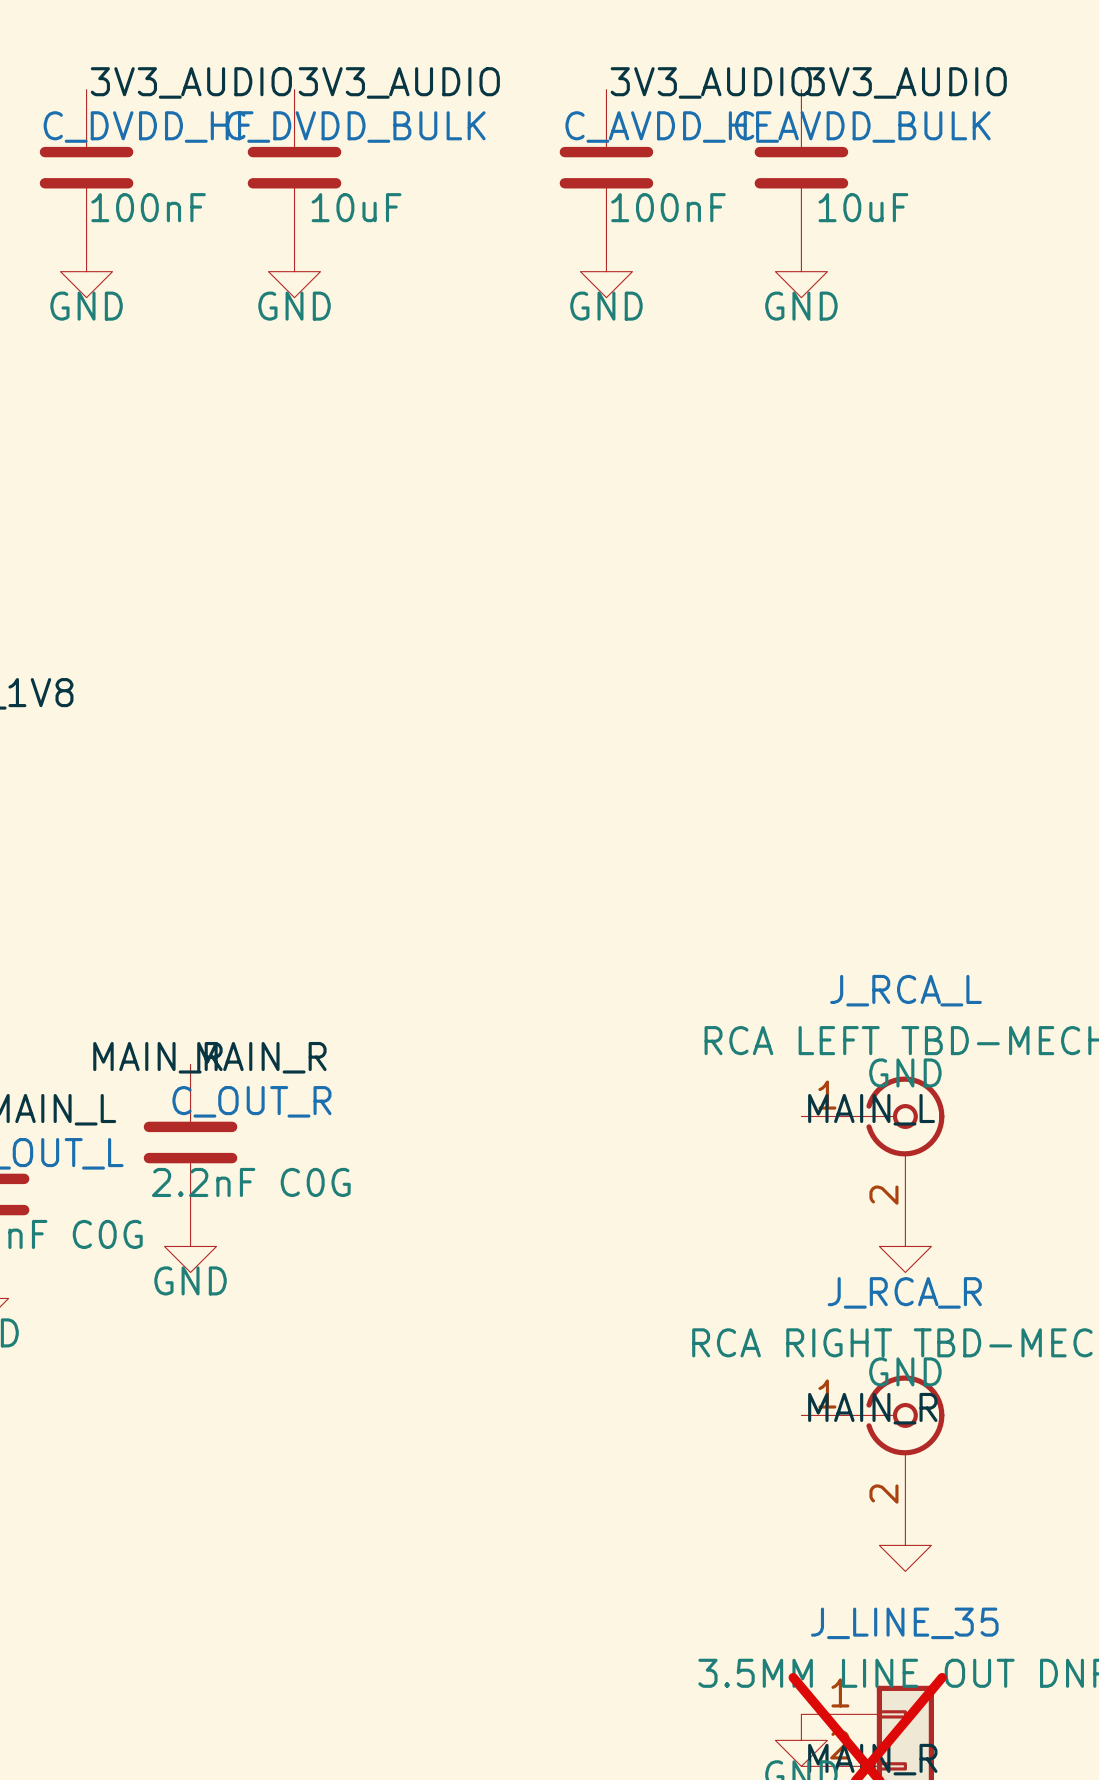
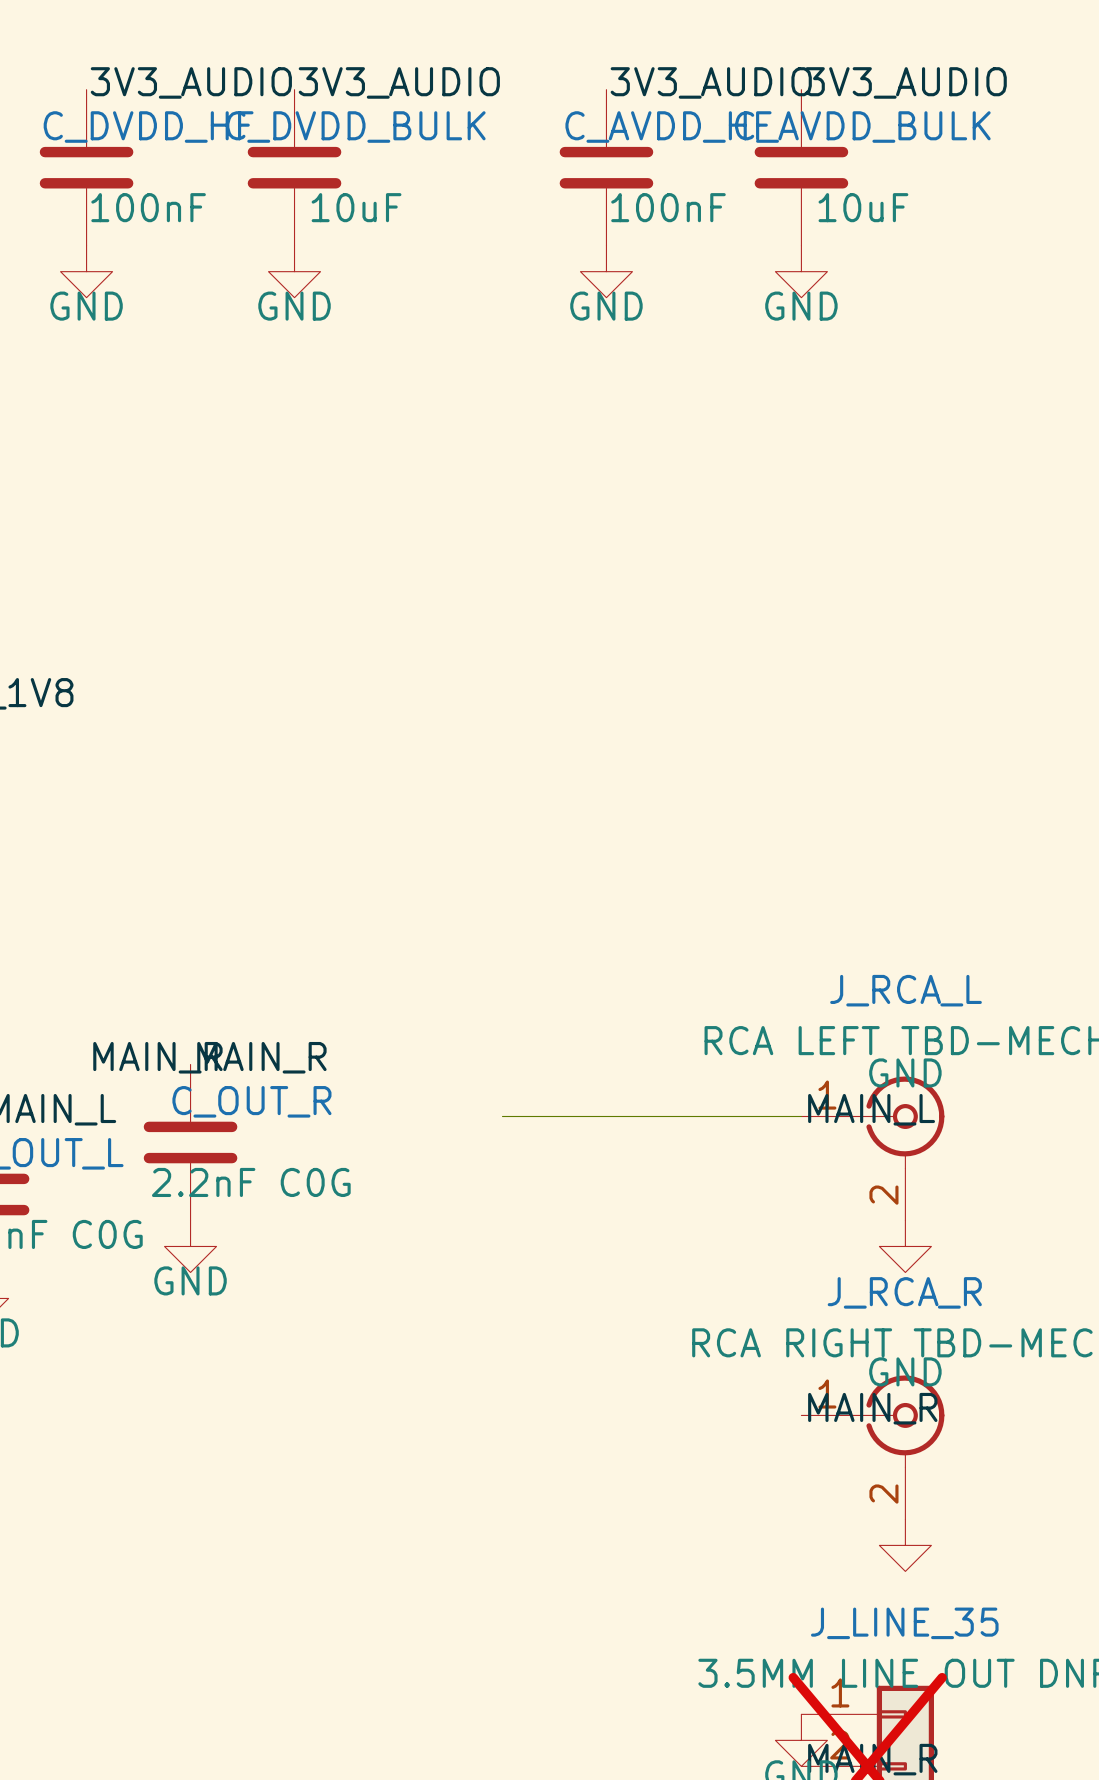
wire: none -> (502, 1116) (801, 1116)

